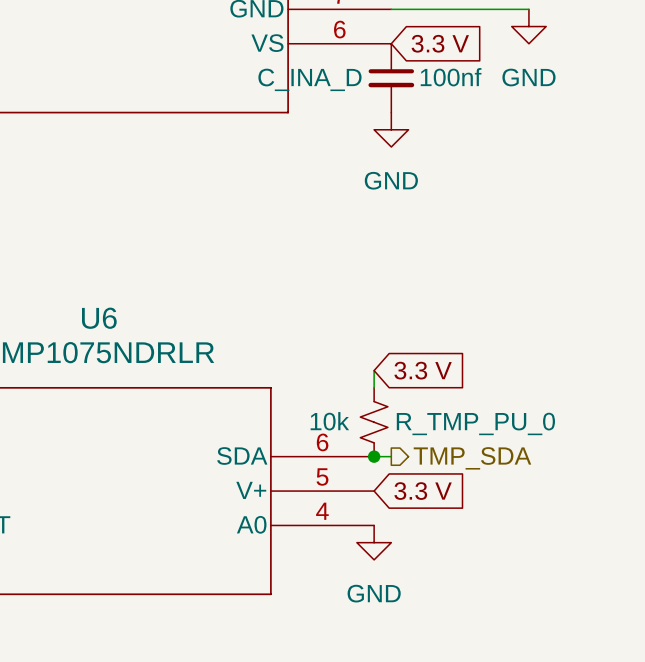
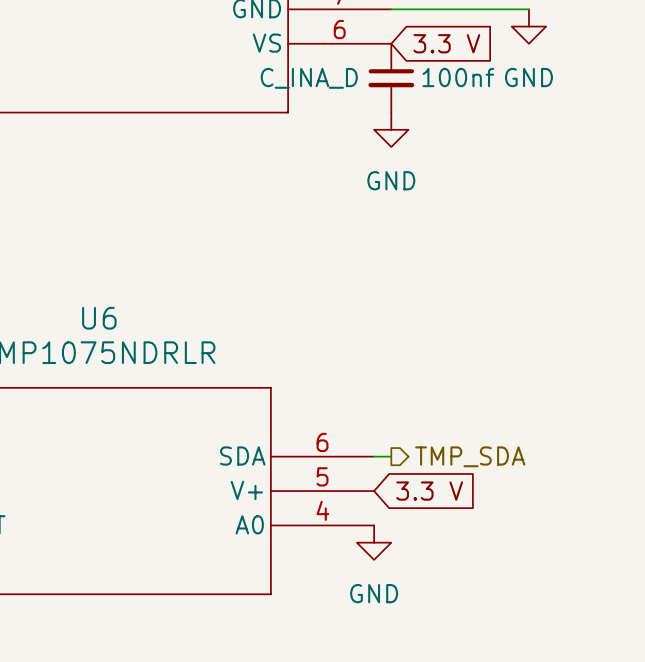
wire: (374, 370) (374, 387) -> none
global label: 3.3 V (423, 370) -> none
R_TMP_PU_0: 10k (374, 422) -> none
junction: (374, 456) -> none

